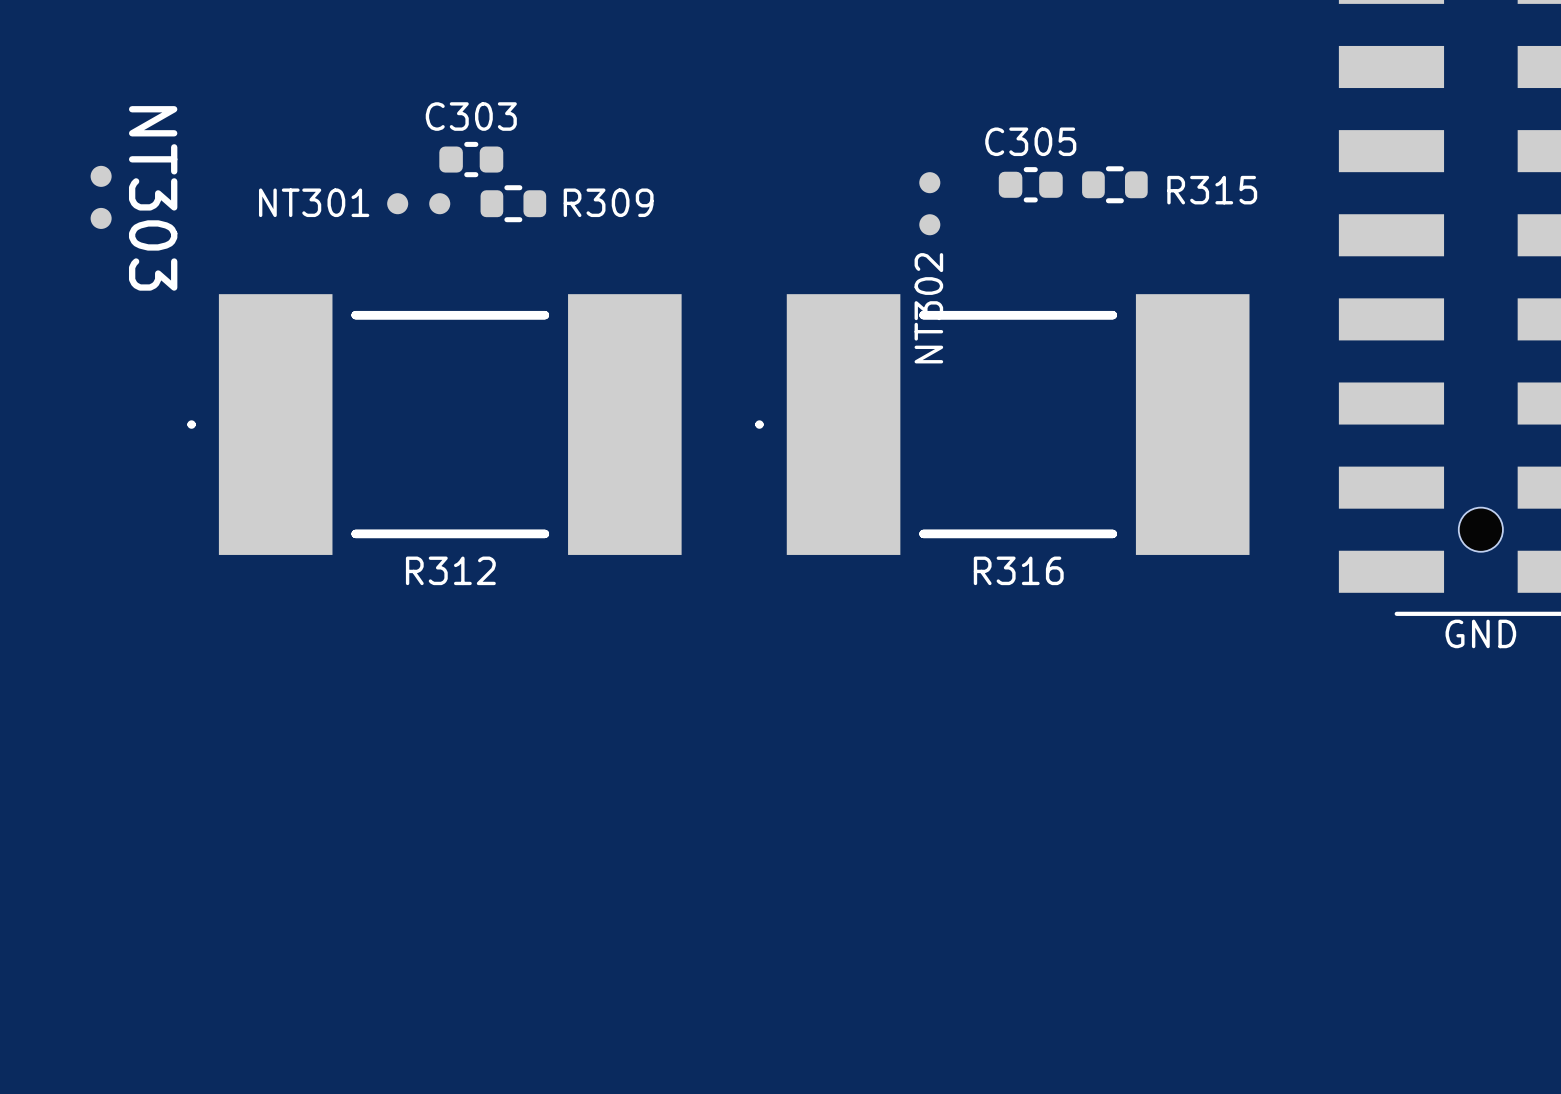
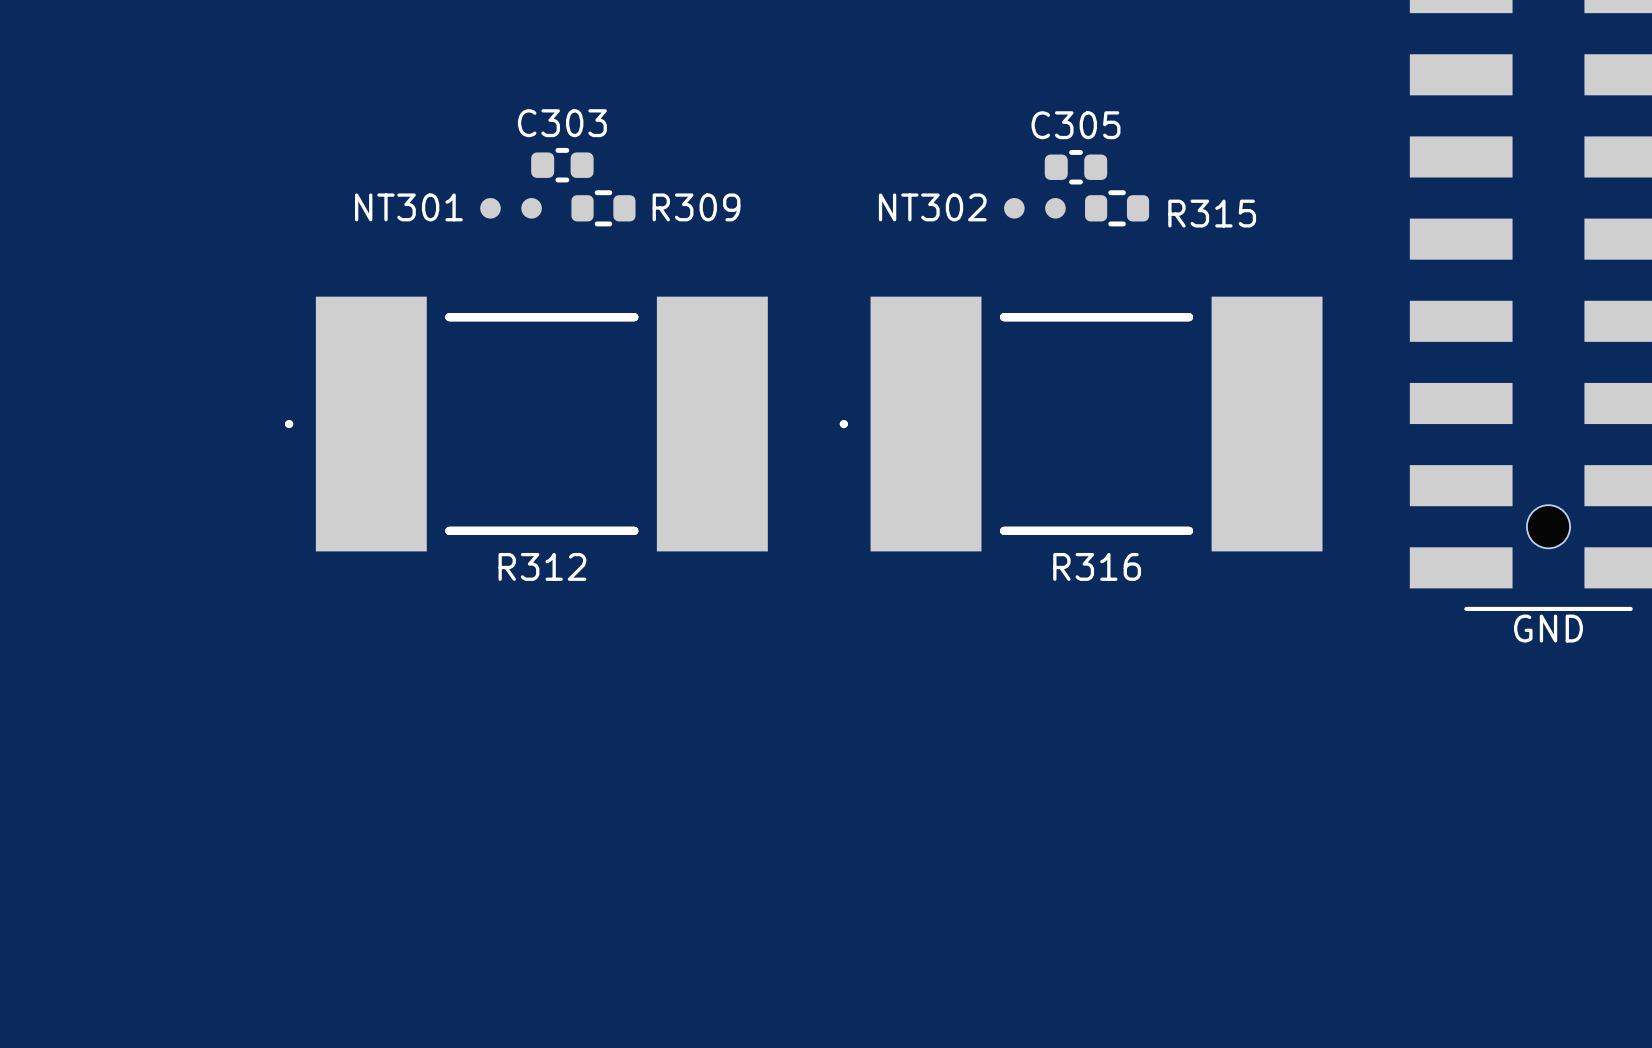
C305 position: (1030, 184) -> (1075, 167)
R315 position: (1114, 184) -> (1117, 208)
NT303: (101, 197) -> none
NT302 rotation: 0° (929, 203) -> 90° clockwise (1034, 208)

